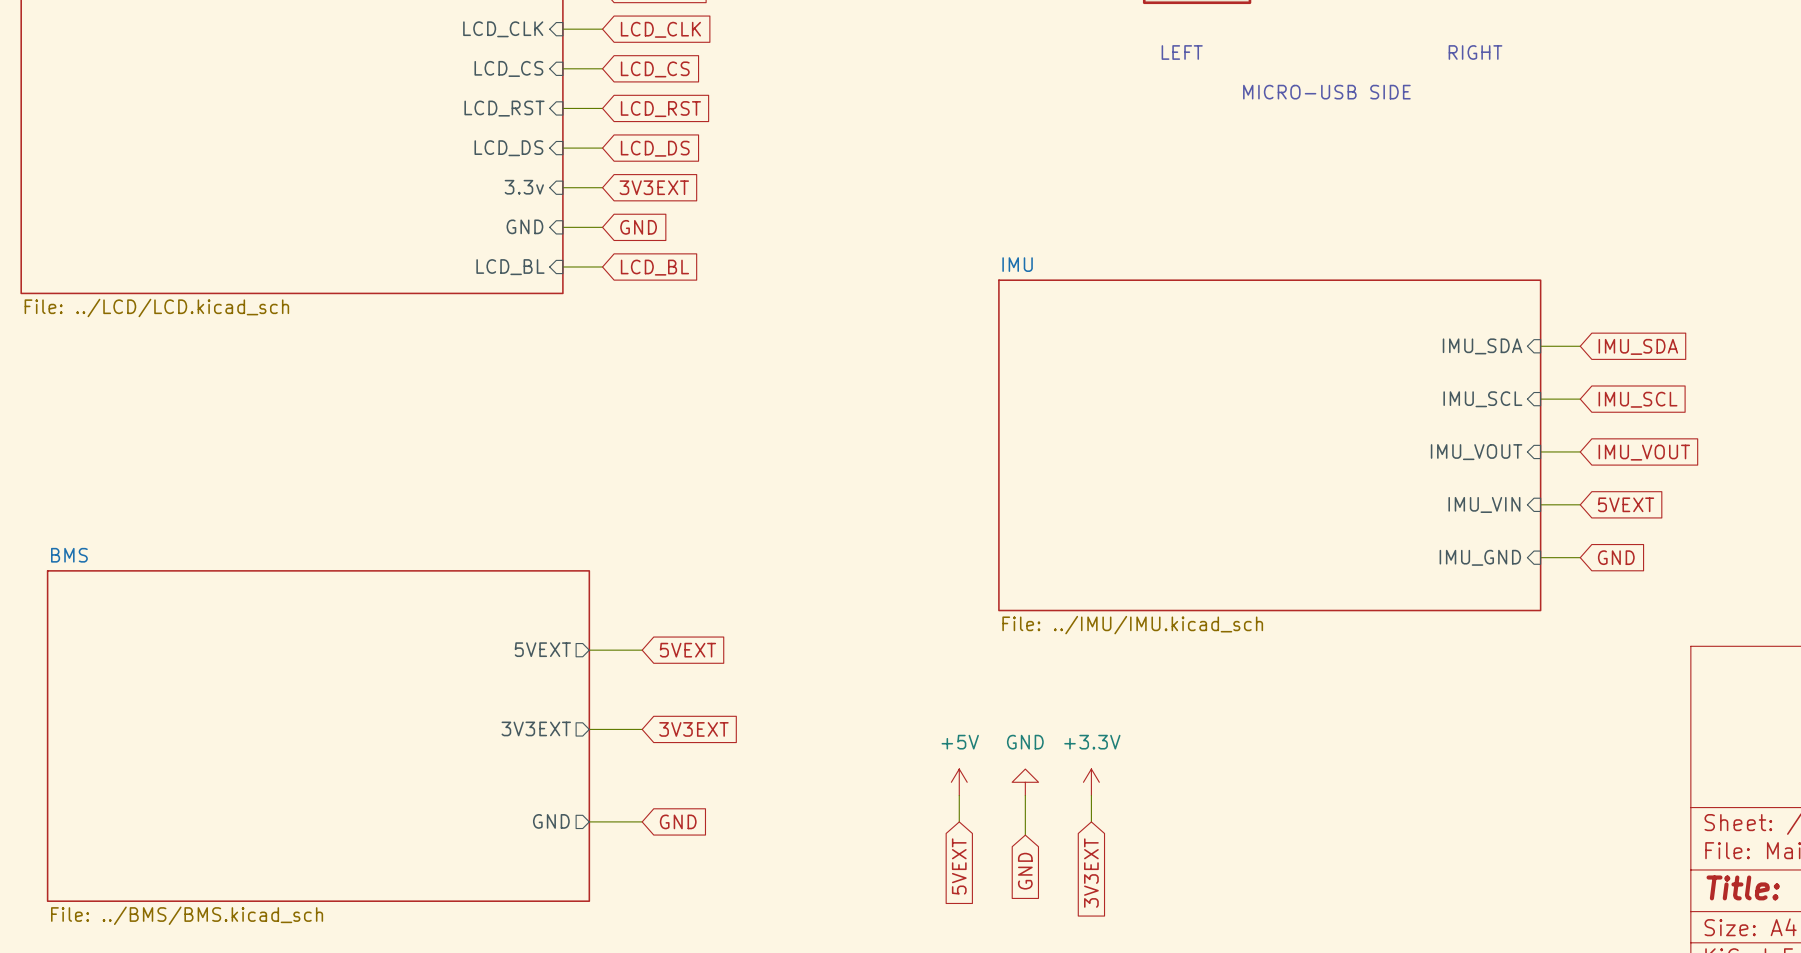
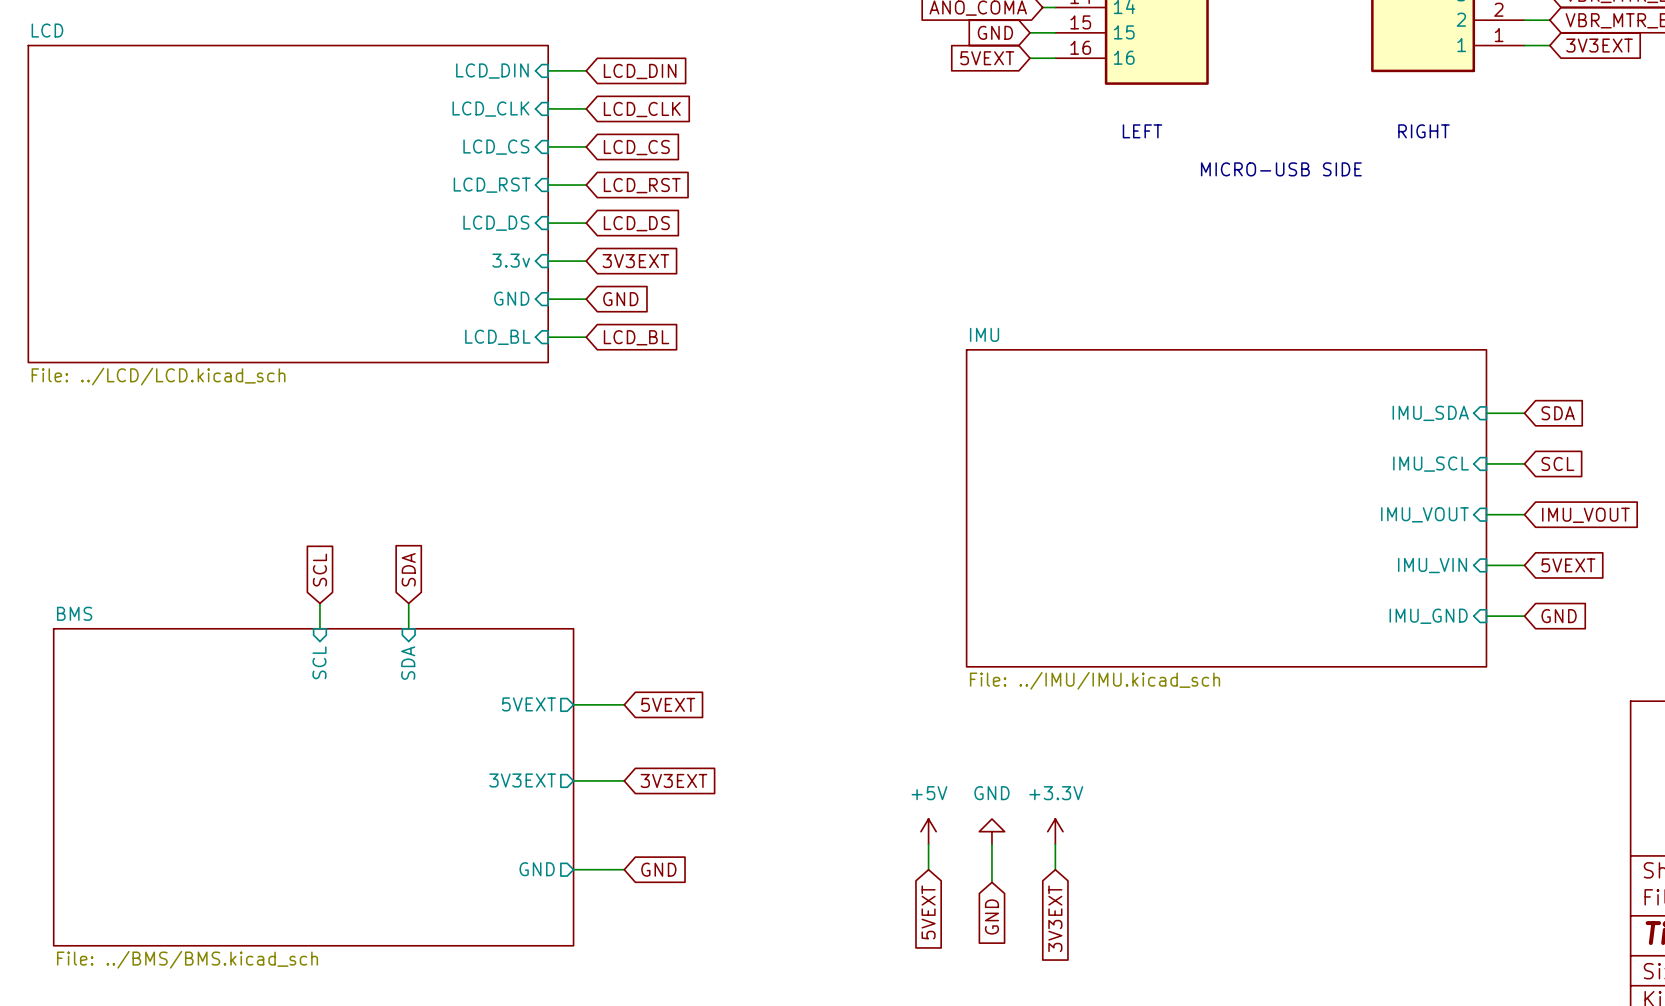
global label: IMU_SDA (1638, 346) -> SDA (1558, 413)
global label: IMU_SCL (1638, 399) -> SCL (1557, 463)
global label: none -> SCL (319, 570)
global label: none -> SDA (408, 569)
wire: none -> (319, 603) (319, 628)
wire: none -> (408, 603) (408, 628)
sheet pin: none -> SCL (319, 662)
sheet pin: none -> SDA (408, 663)

